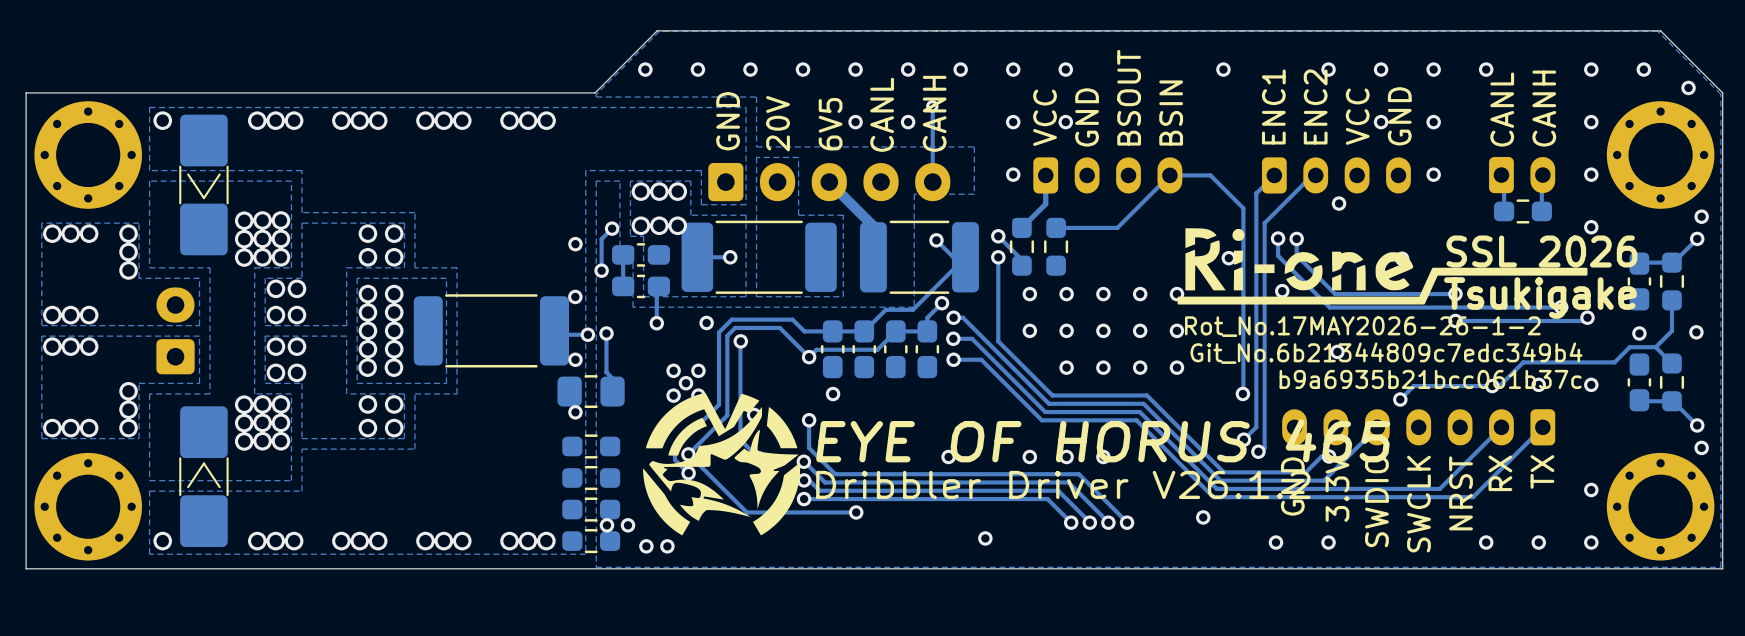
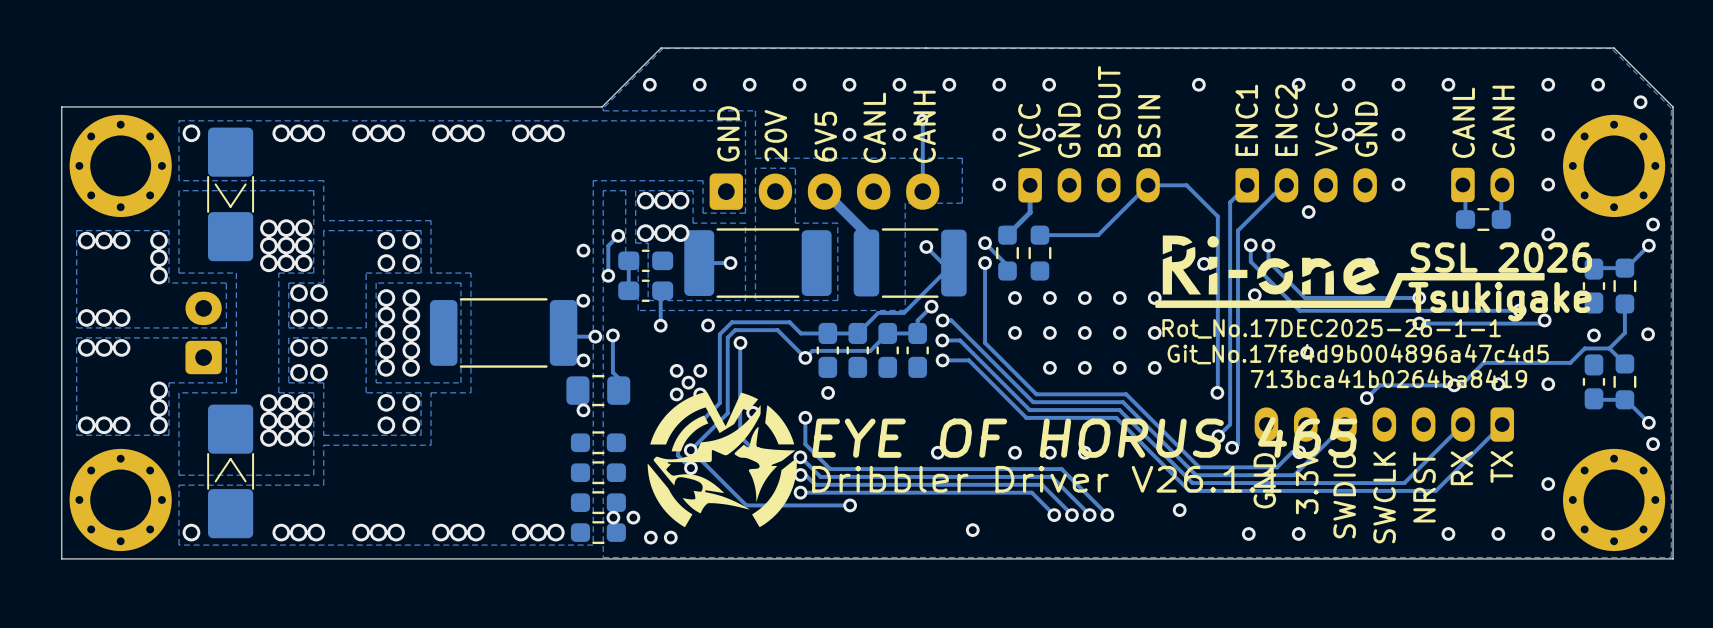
text: Rot_No.17MAY2026-26-1-2 (1362, 326) -> Rot_No.17DEC2025-26-1-1 (1331, 328)
text: Git_No.6b21344809c7edc349b4 (1386, 353) -> Git_No.17fe4d9b004896a47c4d5 (1358, 354)
text: b9a6935b21bcc061b37c (1430, 379) -> 713bca41b0264ba8419 (1388, 378)
text: Dribbler Driver V26.1.2 (1063, 484) -> Dribbler Driver V26.1.1 (1046, 479)

